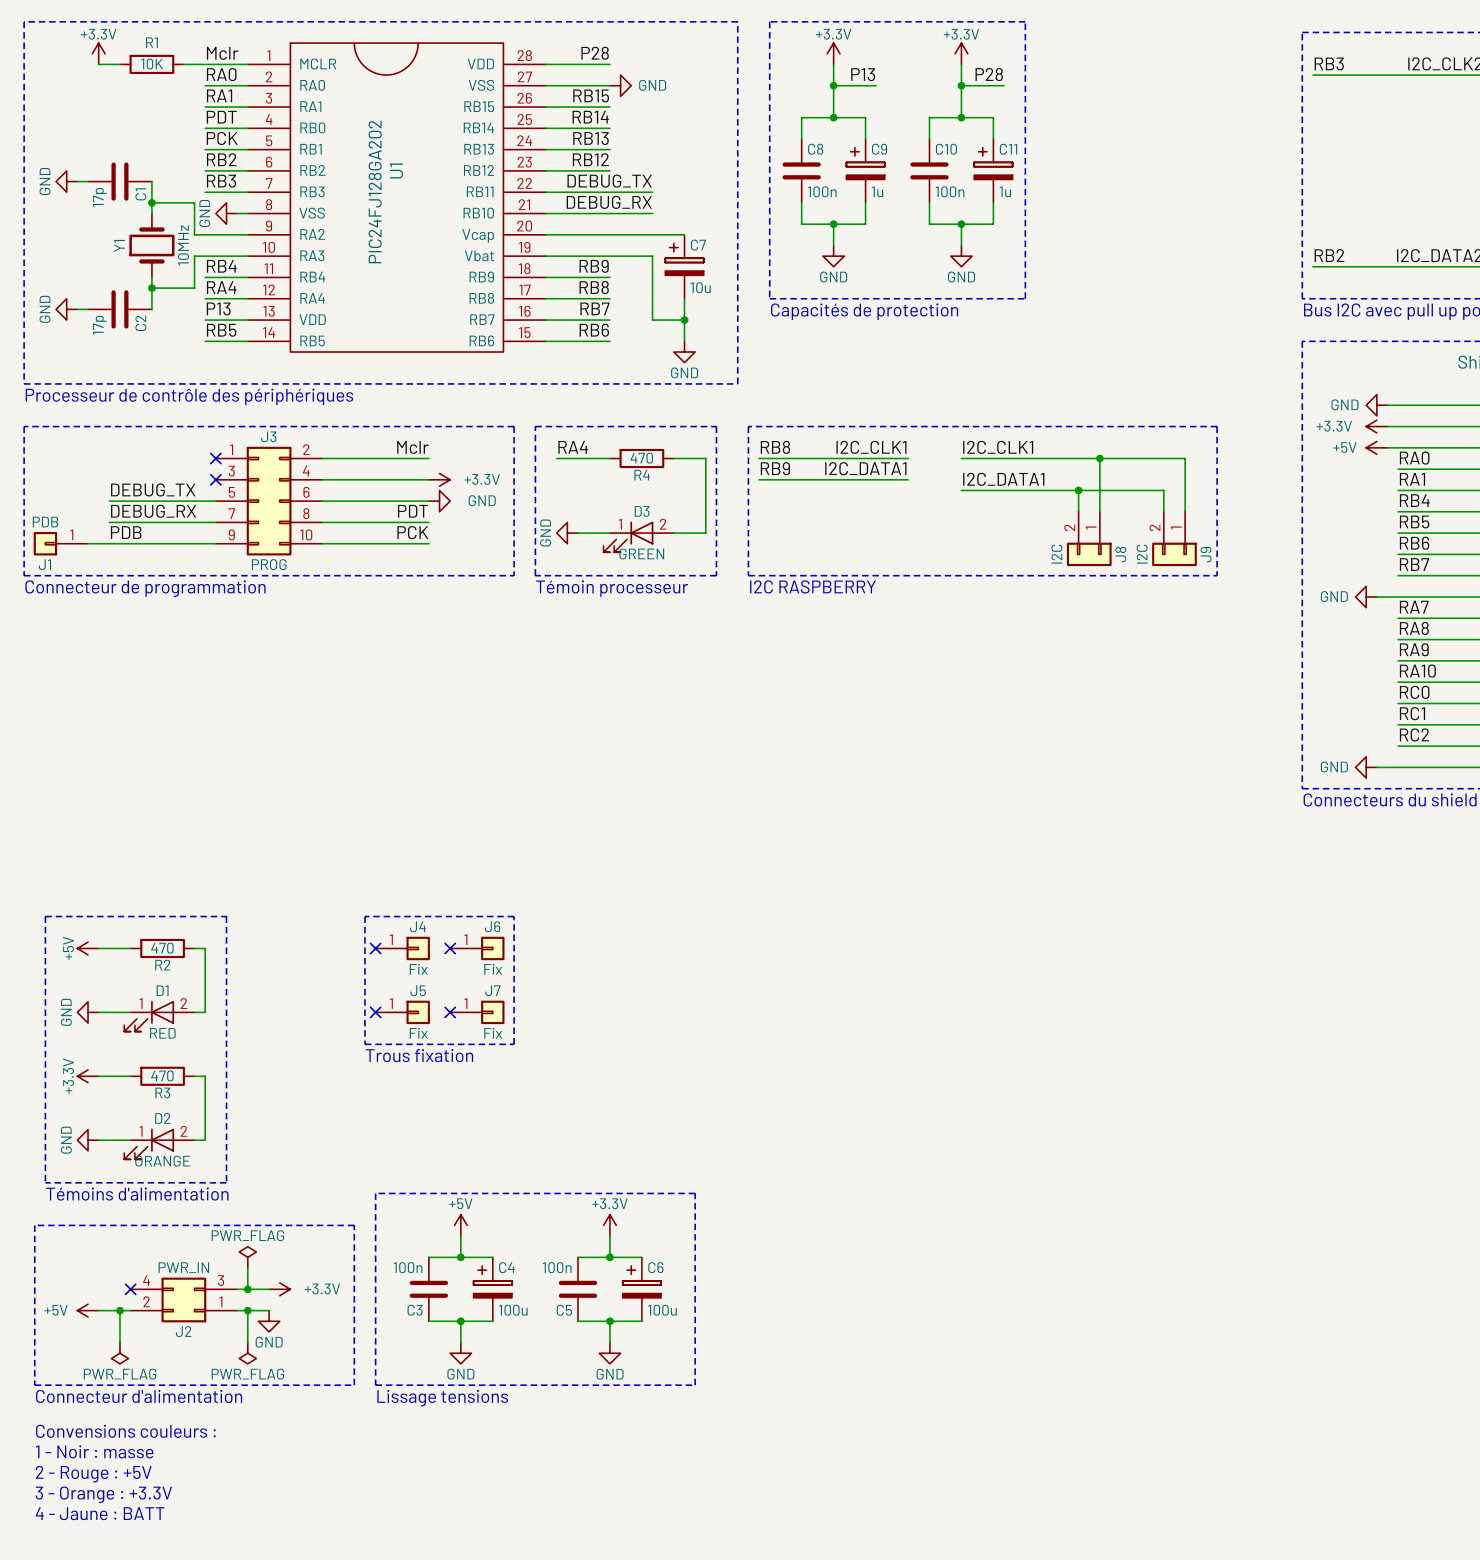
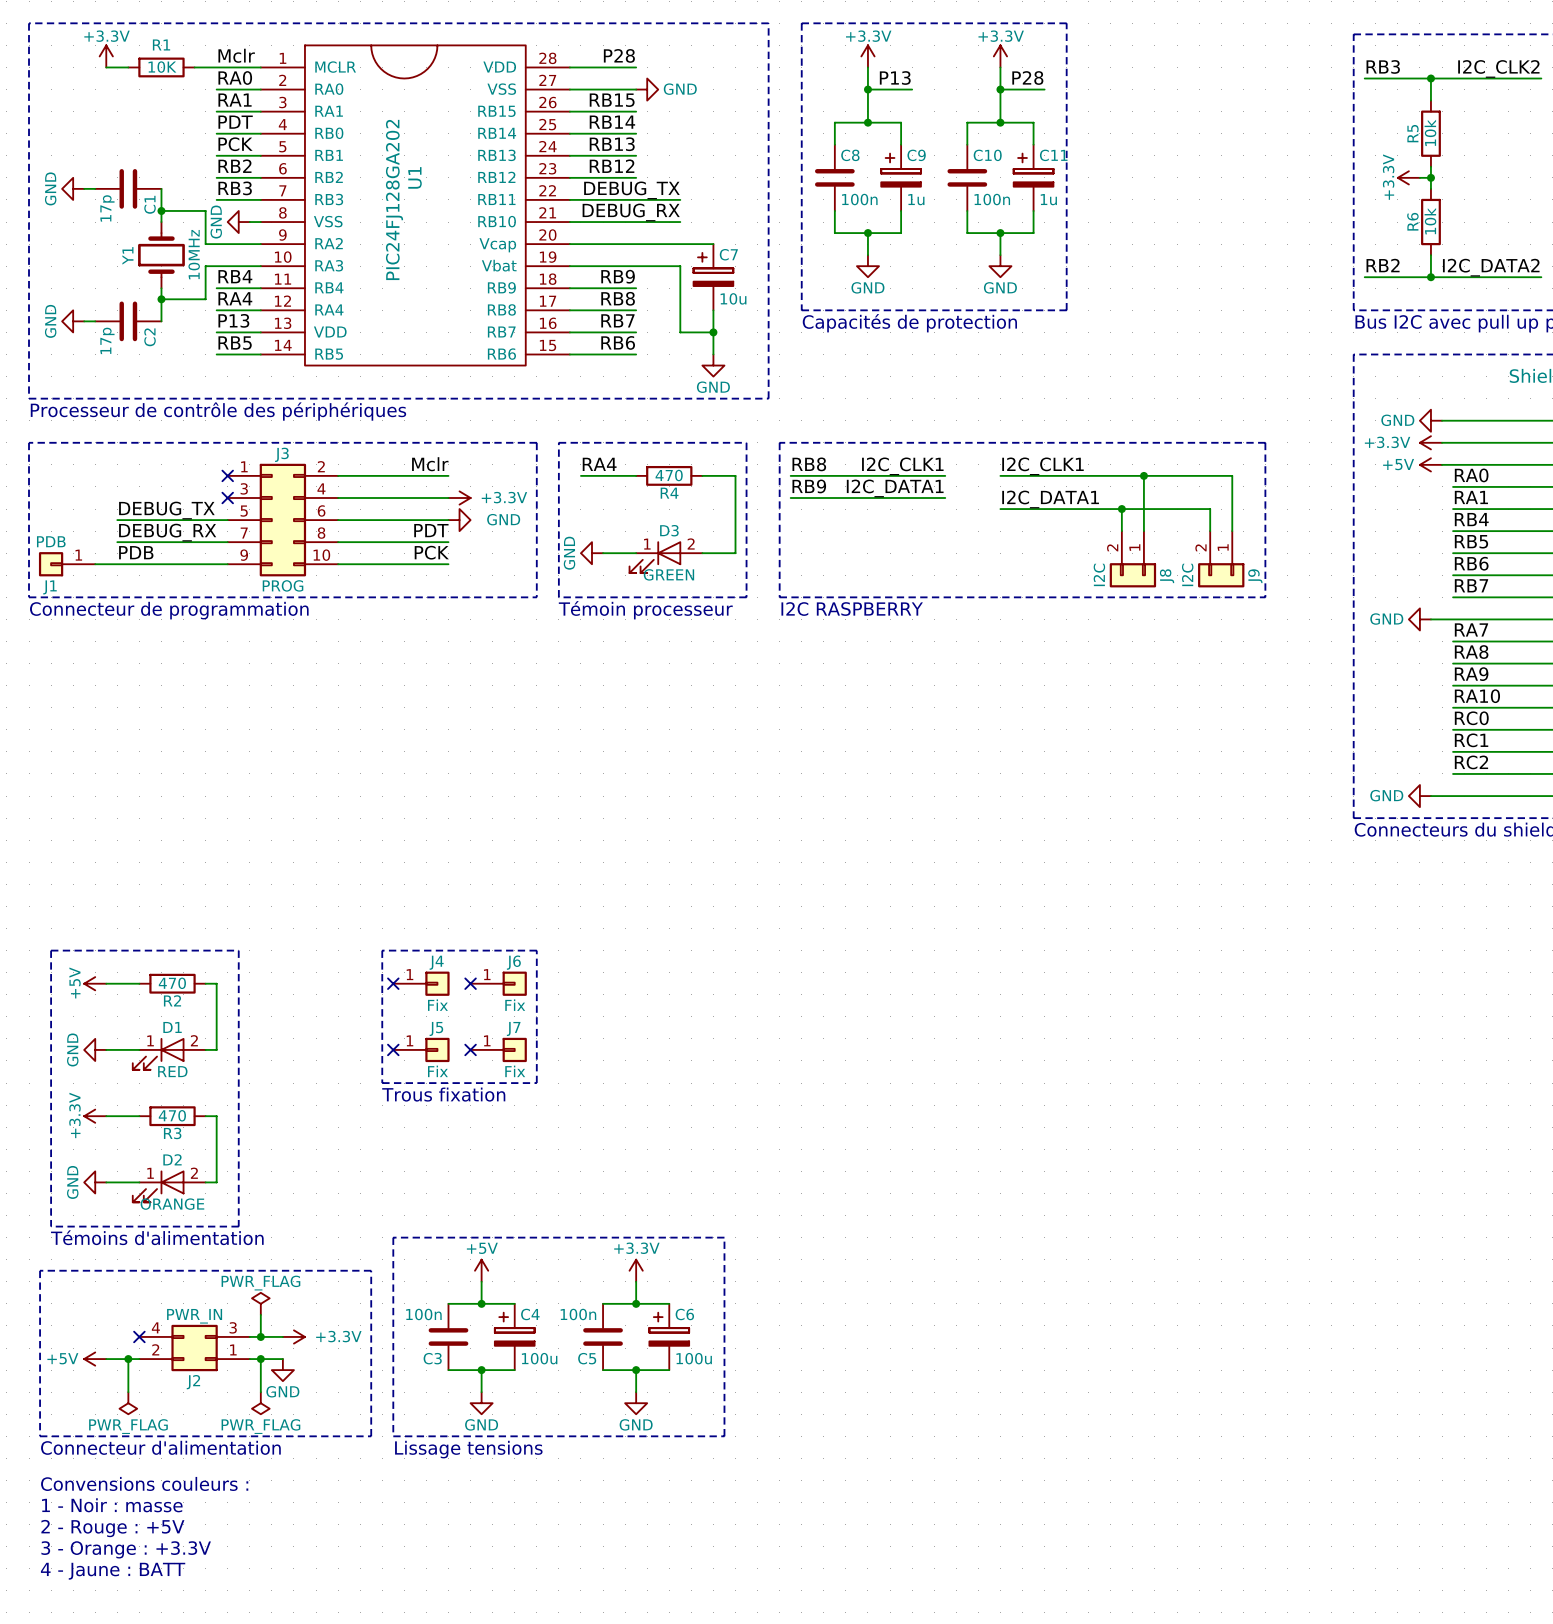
wire: none -> (1430, 78) (1430, 100)
junction: none -> (1430, 78)
R5: none -> 10k (1430, 133)
wire: none -> (1430, 166) (1430, 188)
power symbol: none -> +3.3V (1408, 177)
wire: none -> (1419, 177) (1430, 177)
junction: none -> (1430, 177)
R6: none -> 10k (1430, 222)
wire: none -> (1430, 255) (1430, 277)
junction: none -> (1430, 277)

